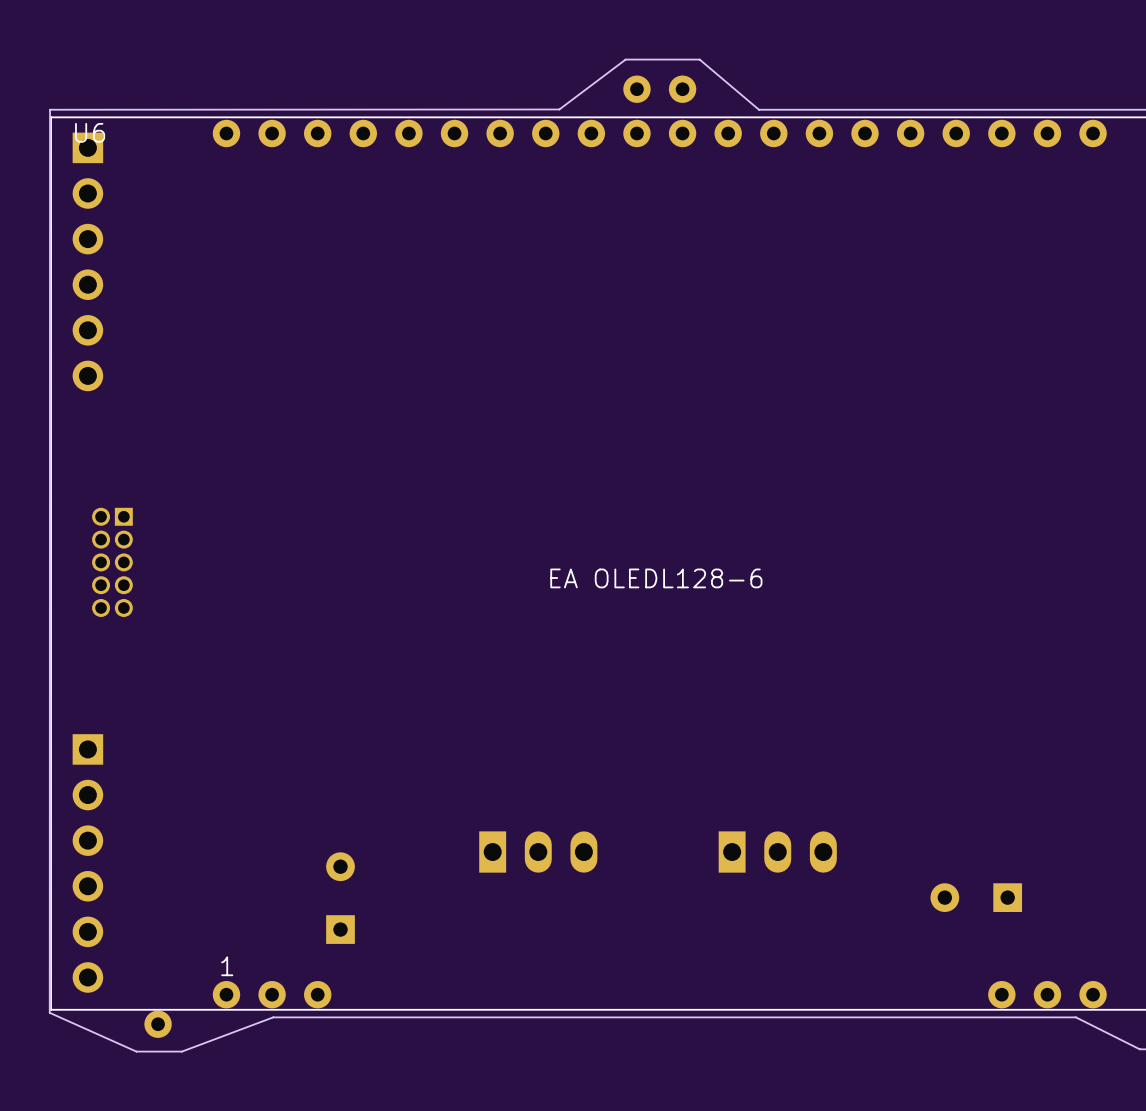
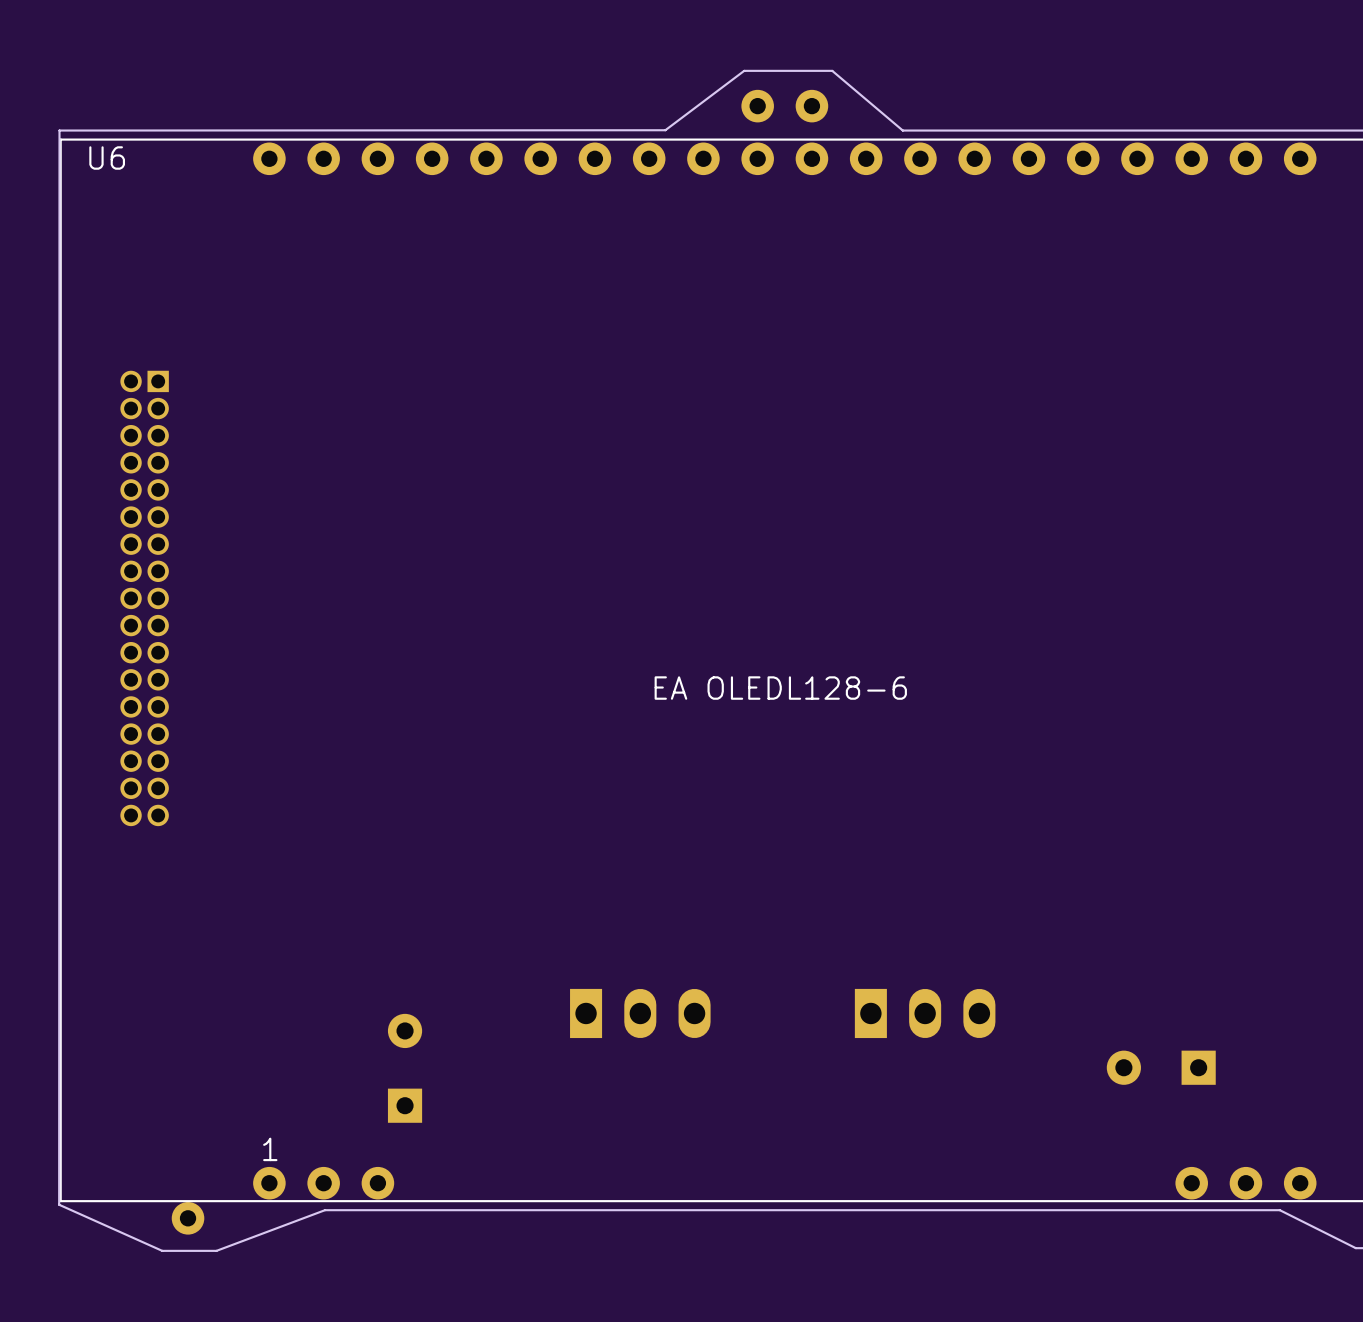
part: (87, 261) -> none
part: none -> (144, 598)
part: (112, 562) -> none
part: (87, 863) -> none

